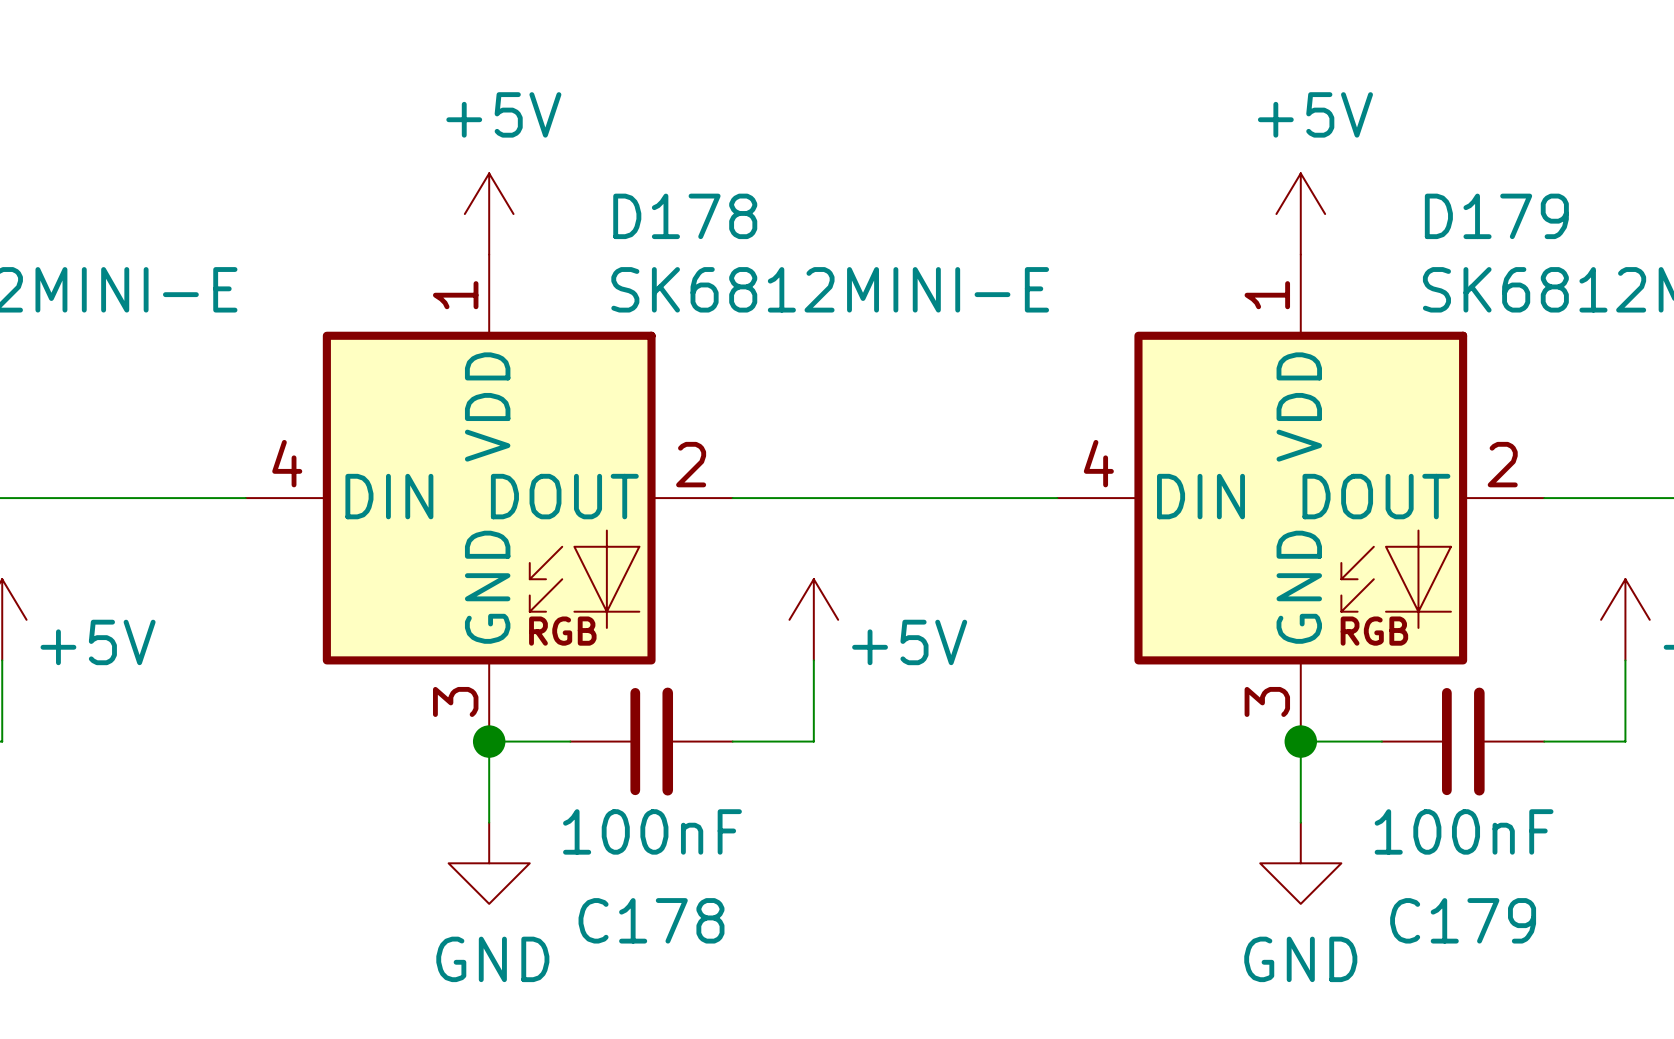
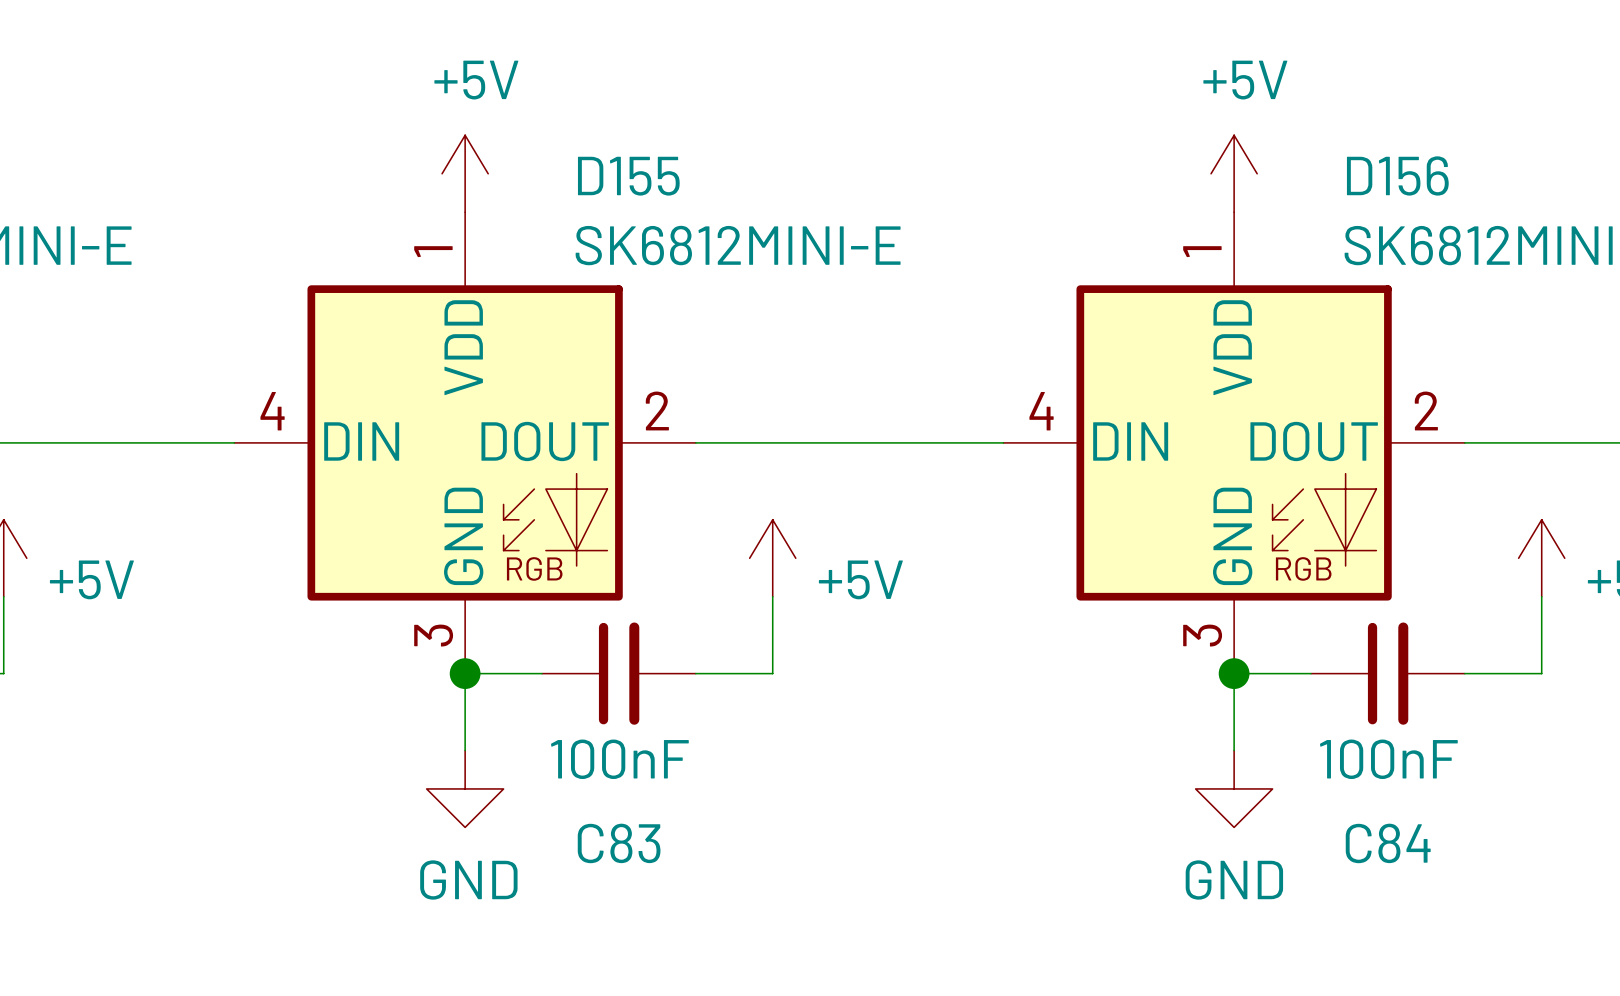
D178 name: D178 (685, 216) -> D155 (628, 176)
D179 name: D179 (1496, 216) -> D156 (1397, 175)
C178 name: C178 (651, 920) -> C83 (619, 843)
C179 name: C179 (1463, 920) -> C84 (1388, 843)

